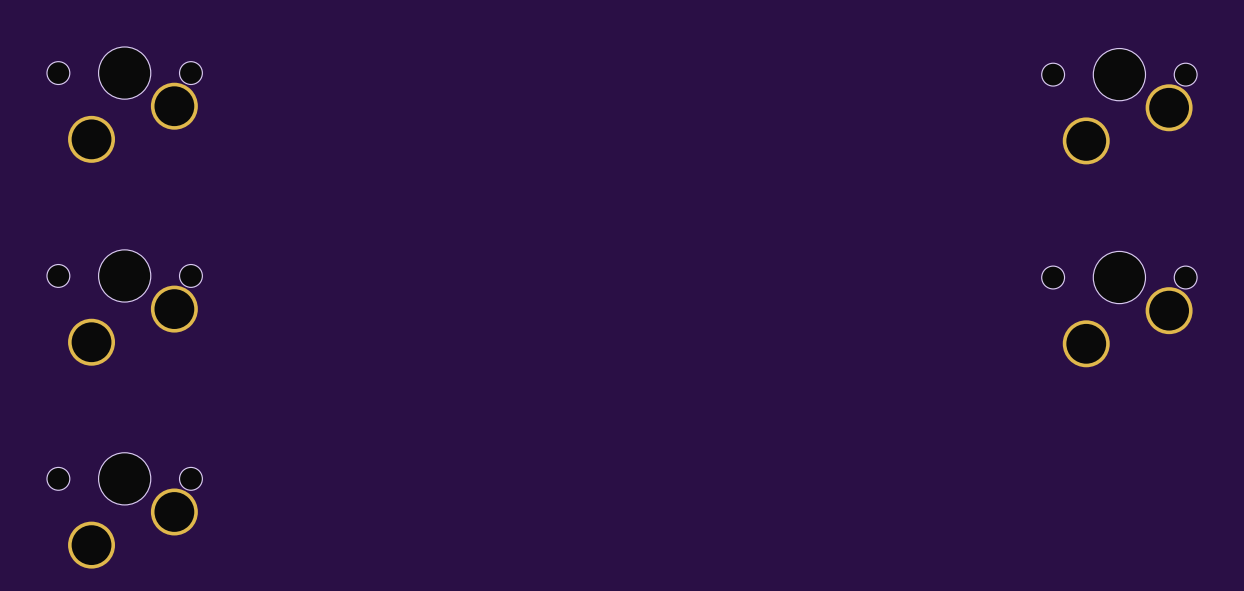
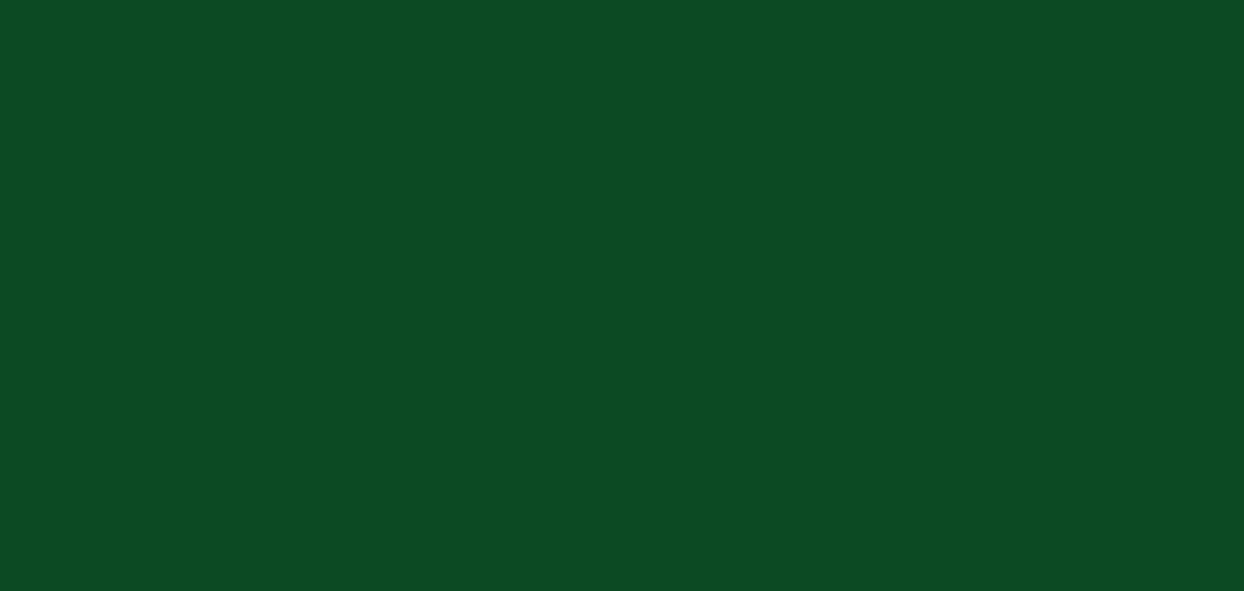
part: (124, 104) -> none
part: (1119, 106) -> none
part: (124, 307) -> none
part: (1119, 309) -> none
part: (124, 510) -> none

